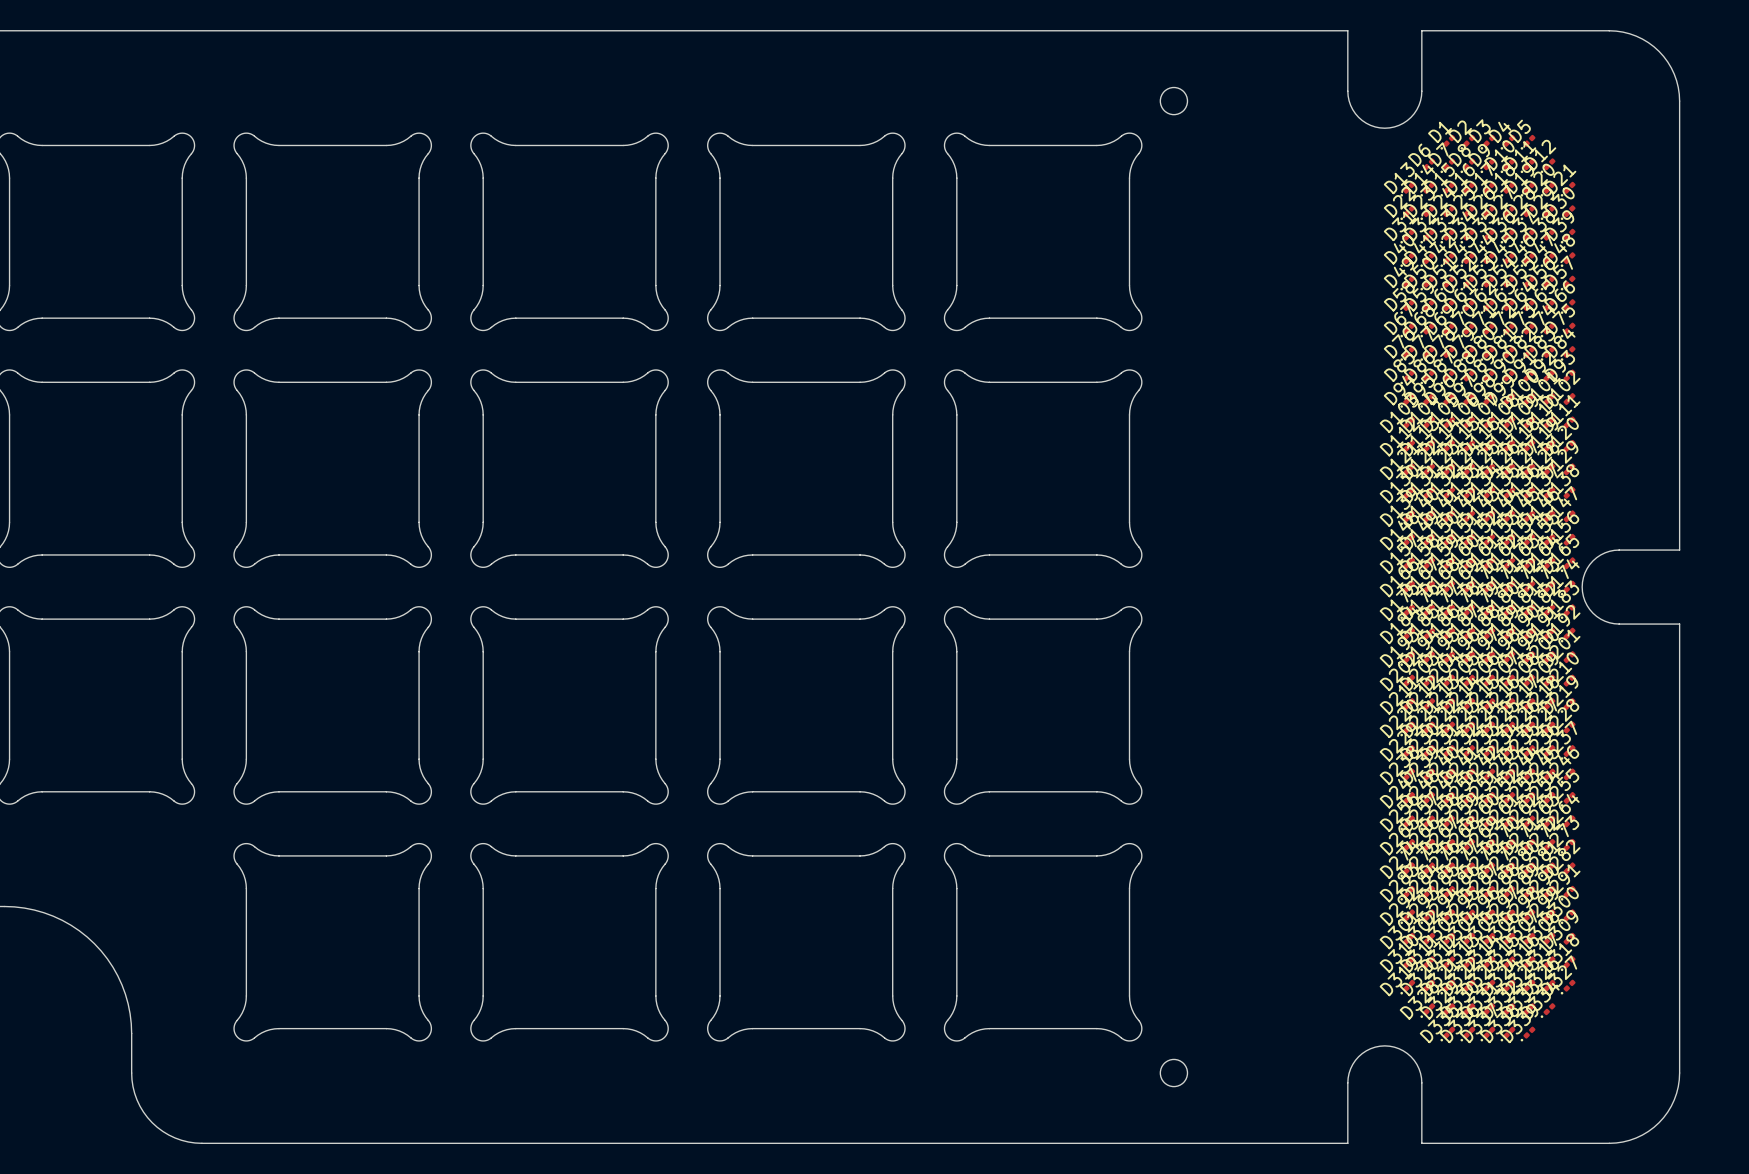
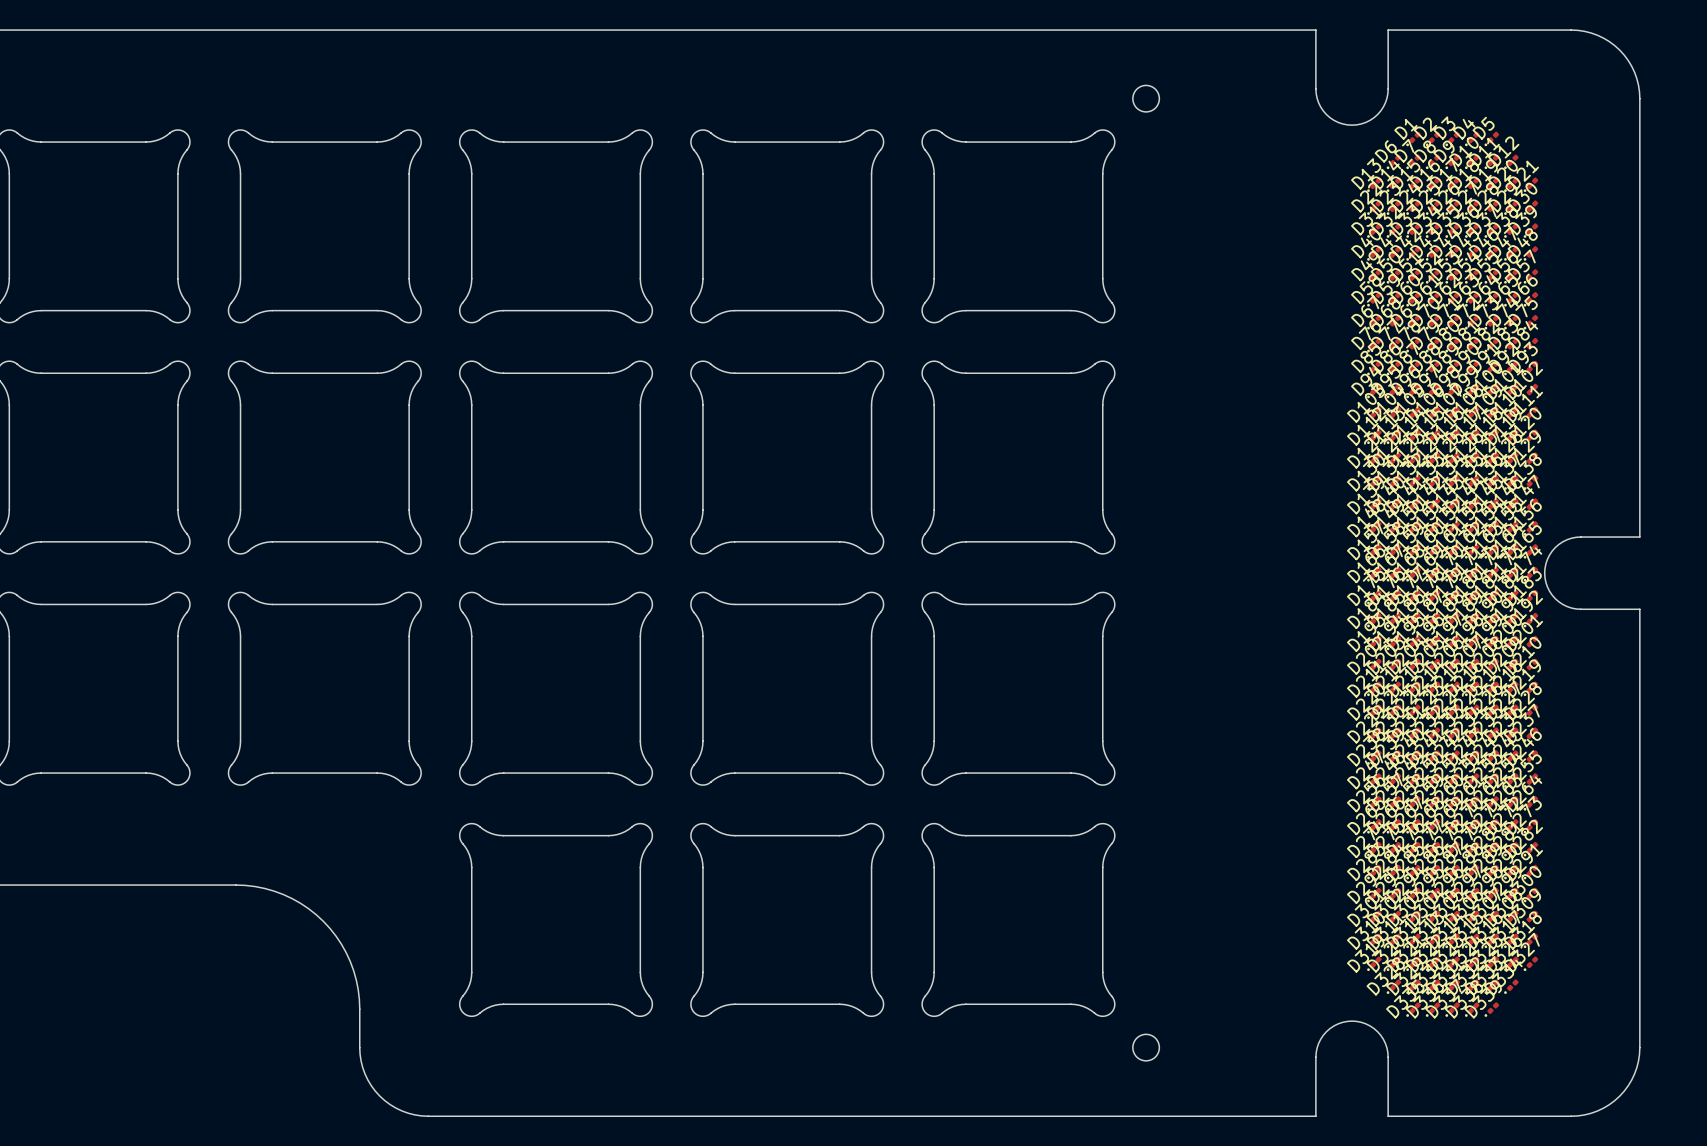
board edge: (254, 846) (247, 843) (241, 844) (236, 848) (234, 855) (243, 875) (246, 888) (246, 995) (243, 1009) (234, 1025) (234, 1032) (237, 1037) (242, 1040) (249, 1040) (265, 1031) (279, 1028) (386, 1028) (399, 1031) (416, 1040) (422, 1040) (427, 1037) (430, 1032) (431, 1025) (421, 1009) (419, 995) (419, 888) (421, 875) (431, 858) (430, 852) (427, 847) (422, 844) (416, 843) (399, 853) (386, 855) (279, 855) (265, 853) (254, 846) -> none
board edge: (4, 906) (34, 910) (62, 920) (87, 936) (107, 958) (117, 975) (128, 1003) (131, 1023) (131, 1079) (134, 1093) (147, 1117) (168, 1135) (181, 1140) (201, 1143) (438, 1143) -> (4, 885) (245, 885) (274, 891) (292, 898) (316, 914) (330, 928) (341, 944) (350, 961) (356, 980) (359, 999) (361, 1060) (371, 1085) (379, 1096) (396, 1108) (415, 1114) (428, 1116)

